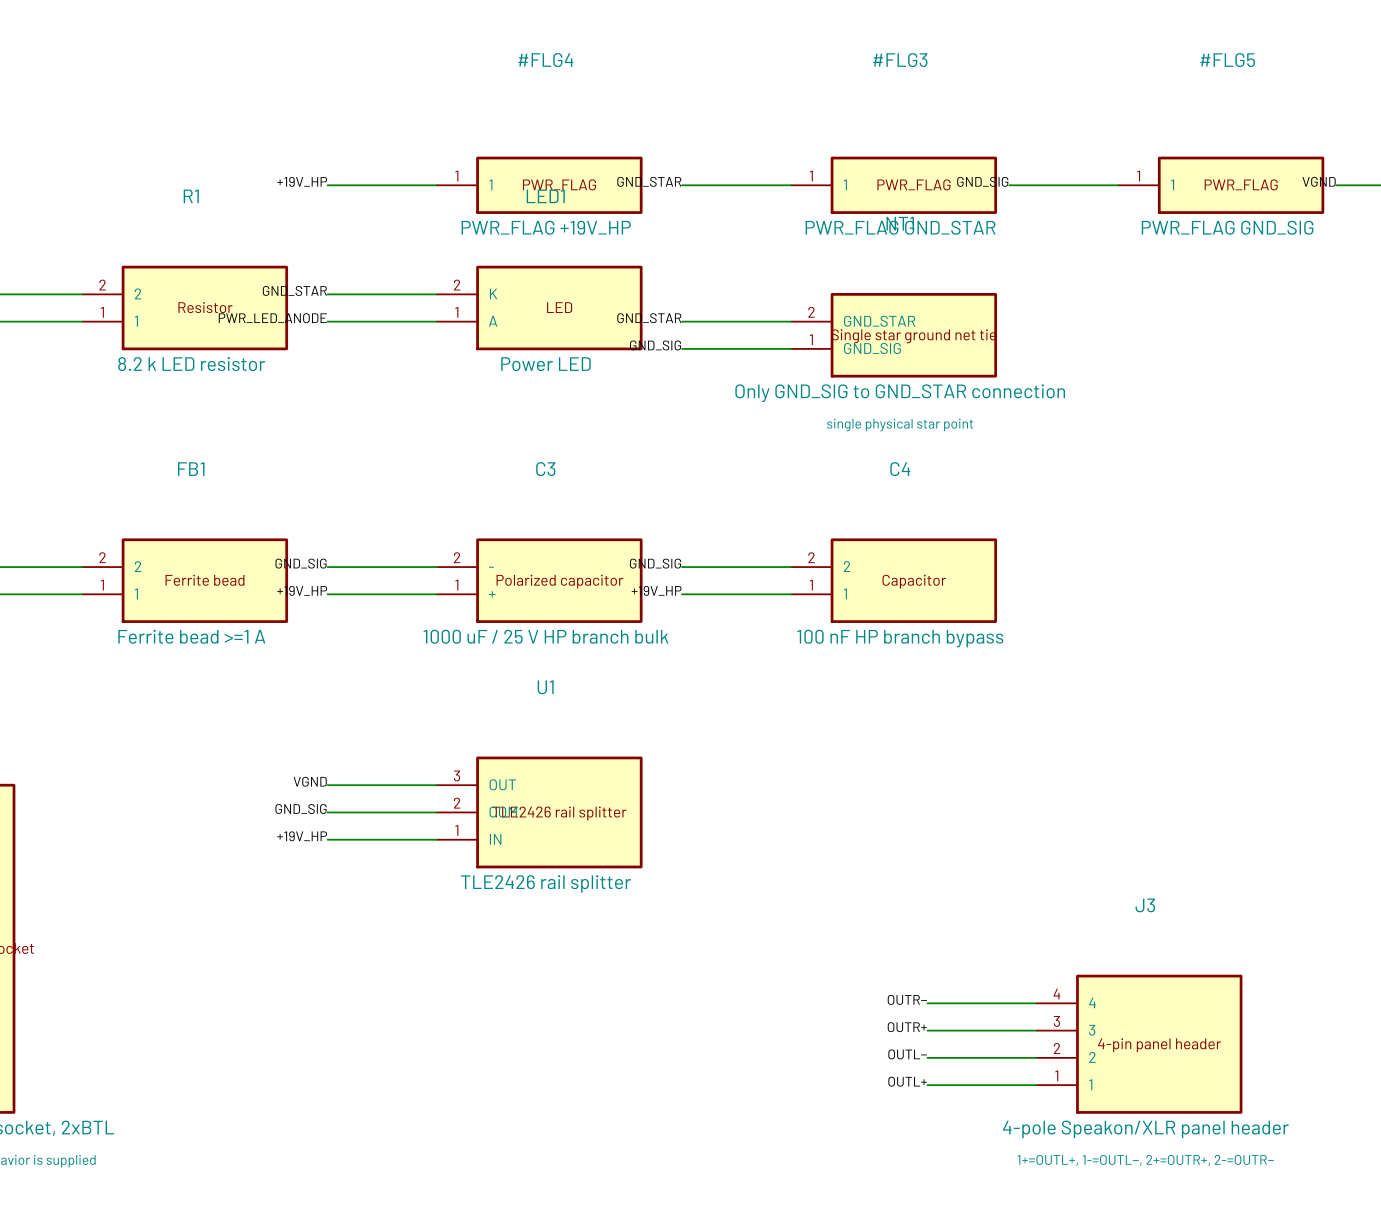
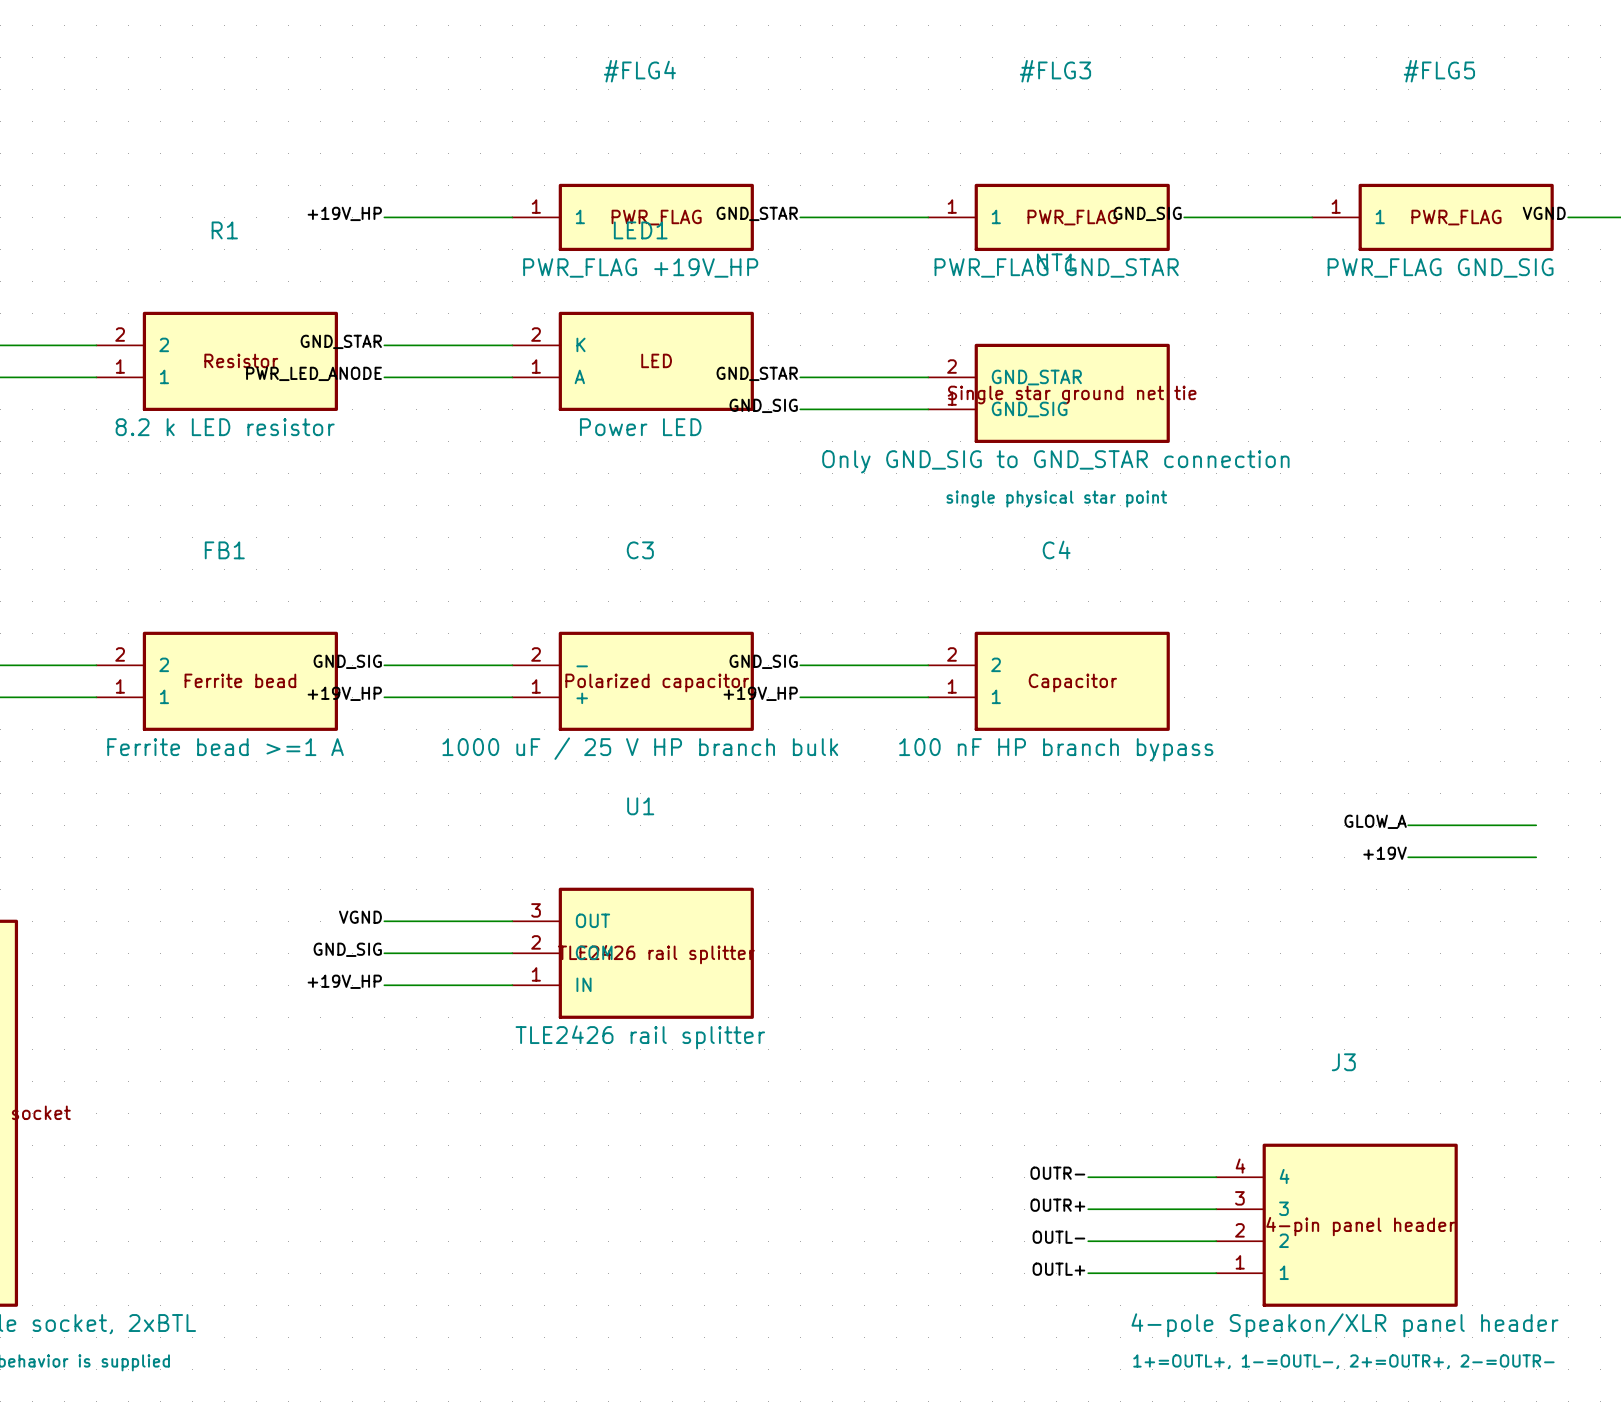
label: none -> GLOW_A (1375, 821)
wire: none -> (1408, 825) (1536, 825)
label: none -> +19V (1385, 853)
wire: none -> (1408, 857) (1536, 857)

